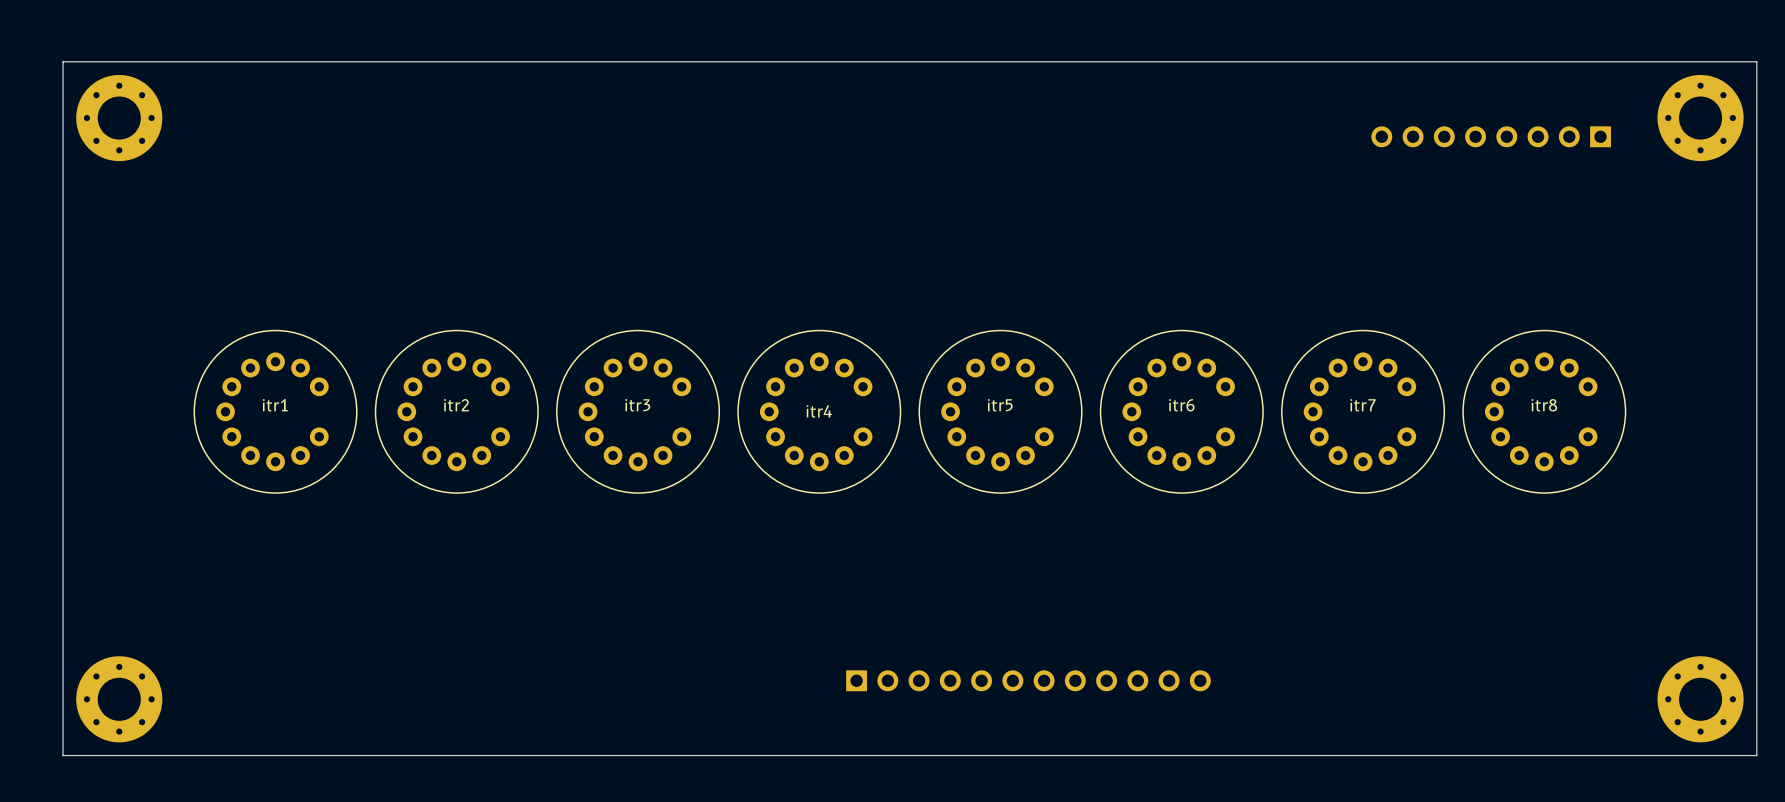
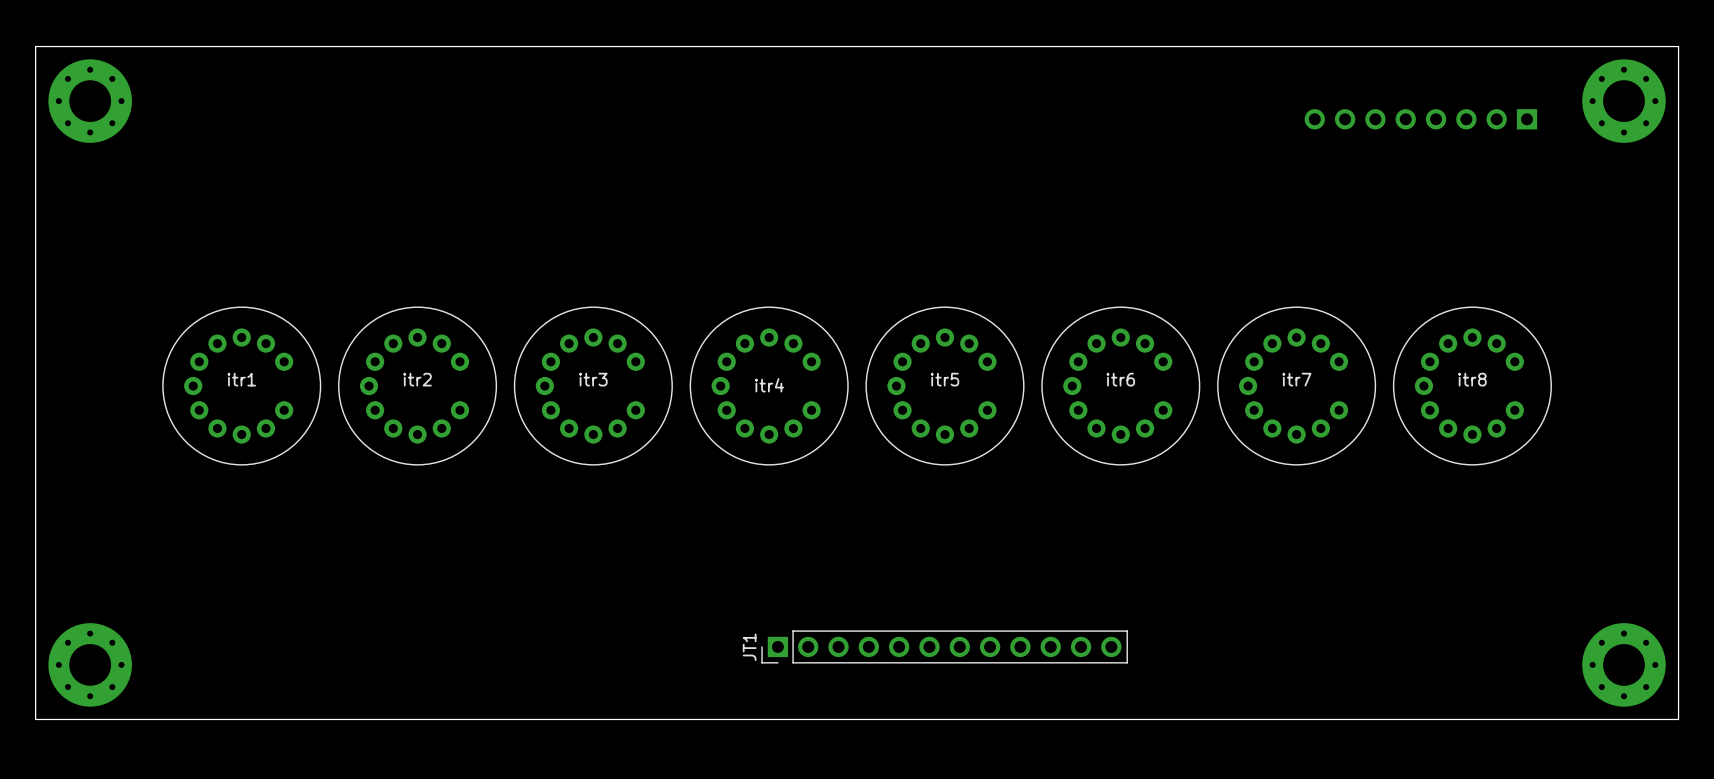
JT1 side: bottom (1028, 680) -> top (944, 646)

